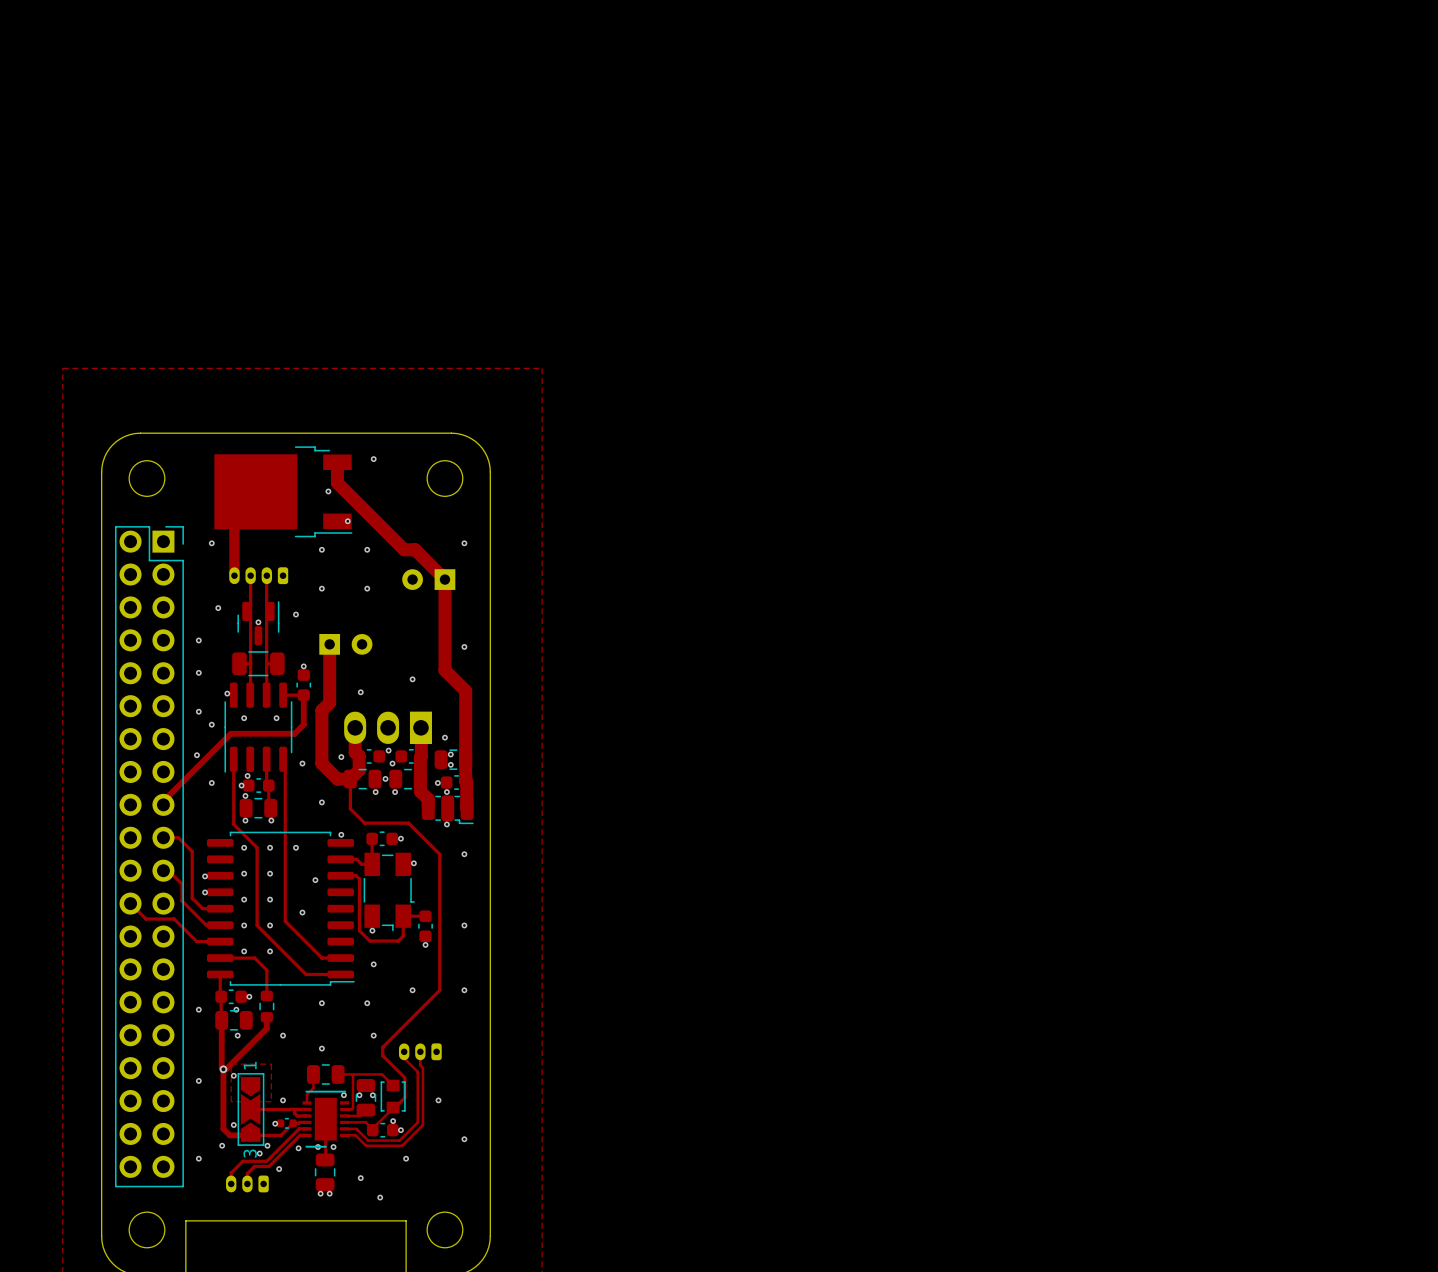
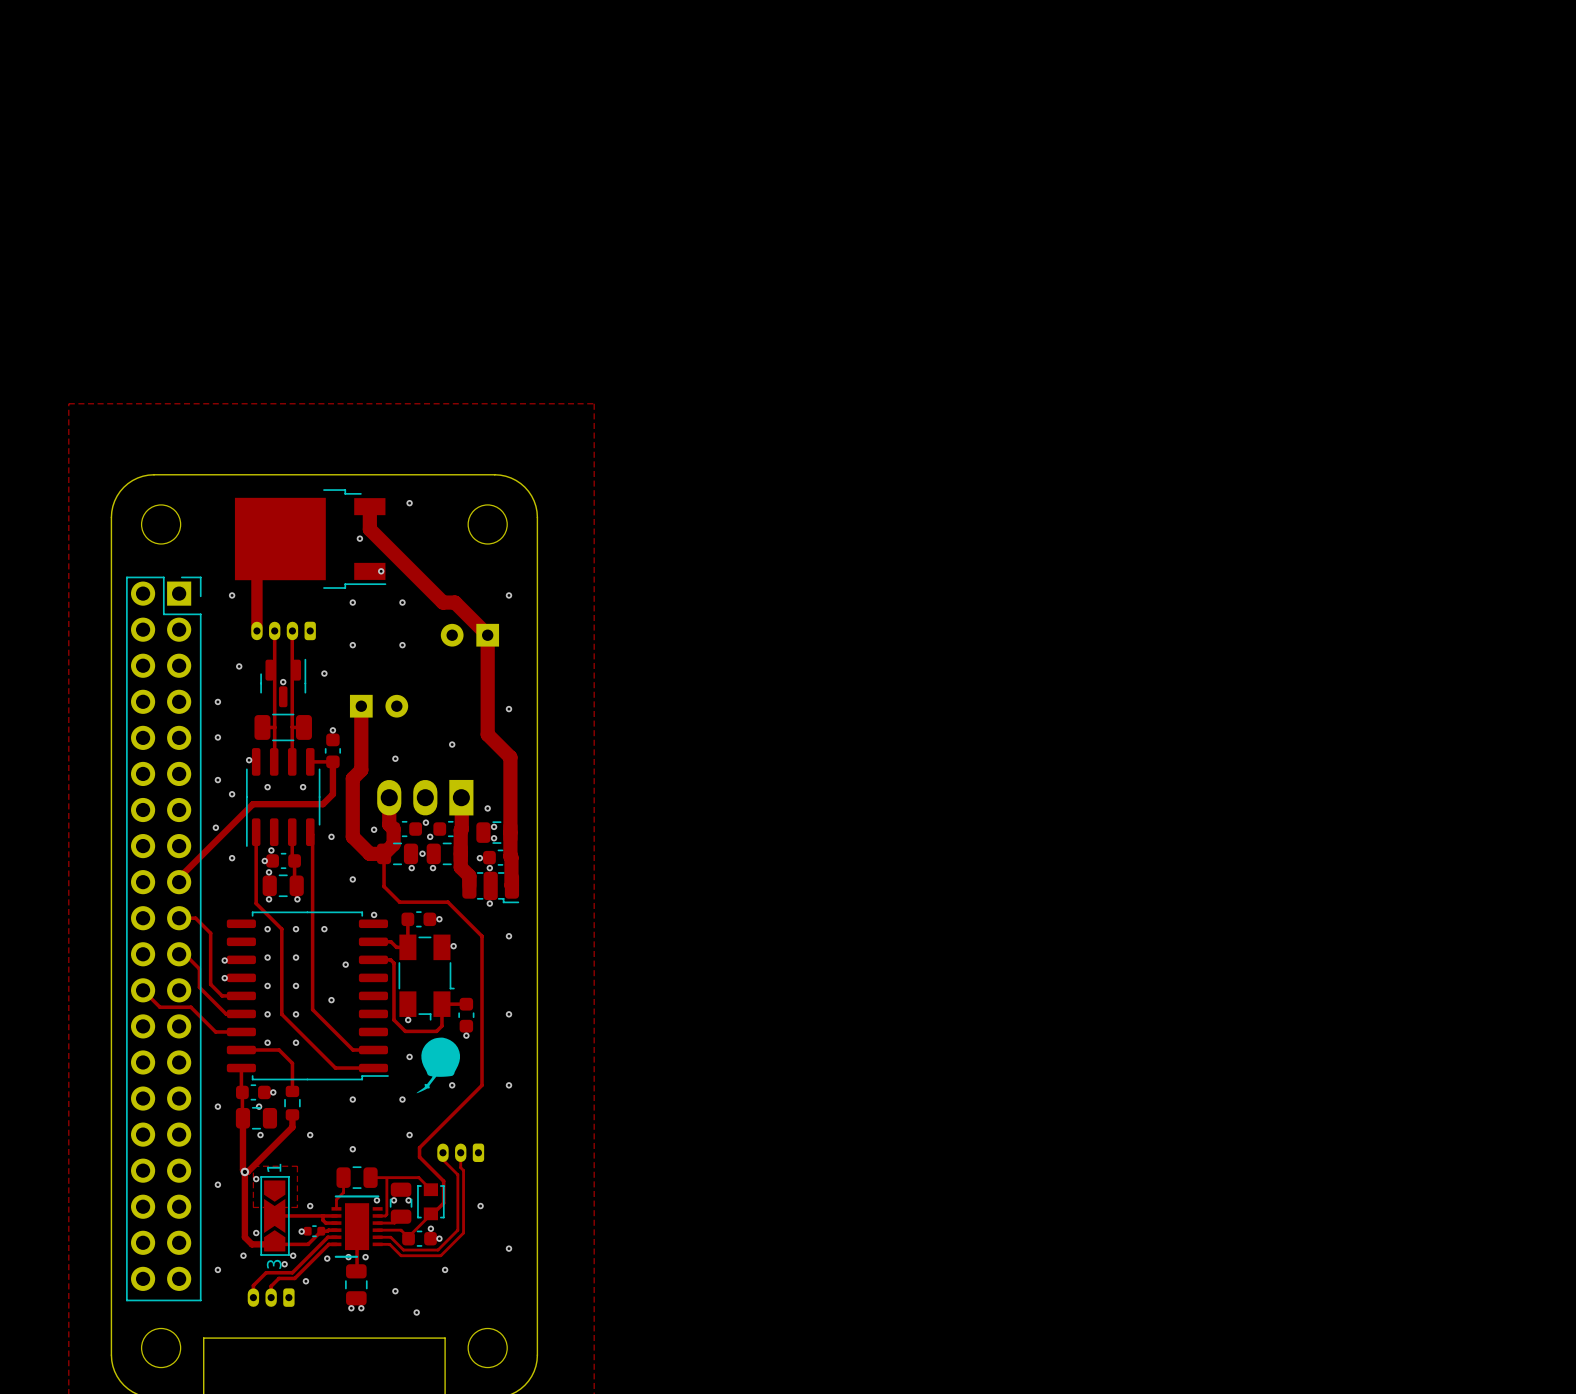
drawing: none -> [416, 1037, 461, 1094]

